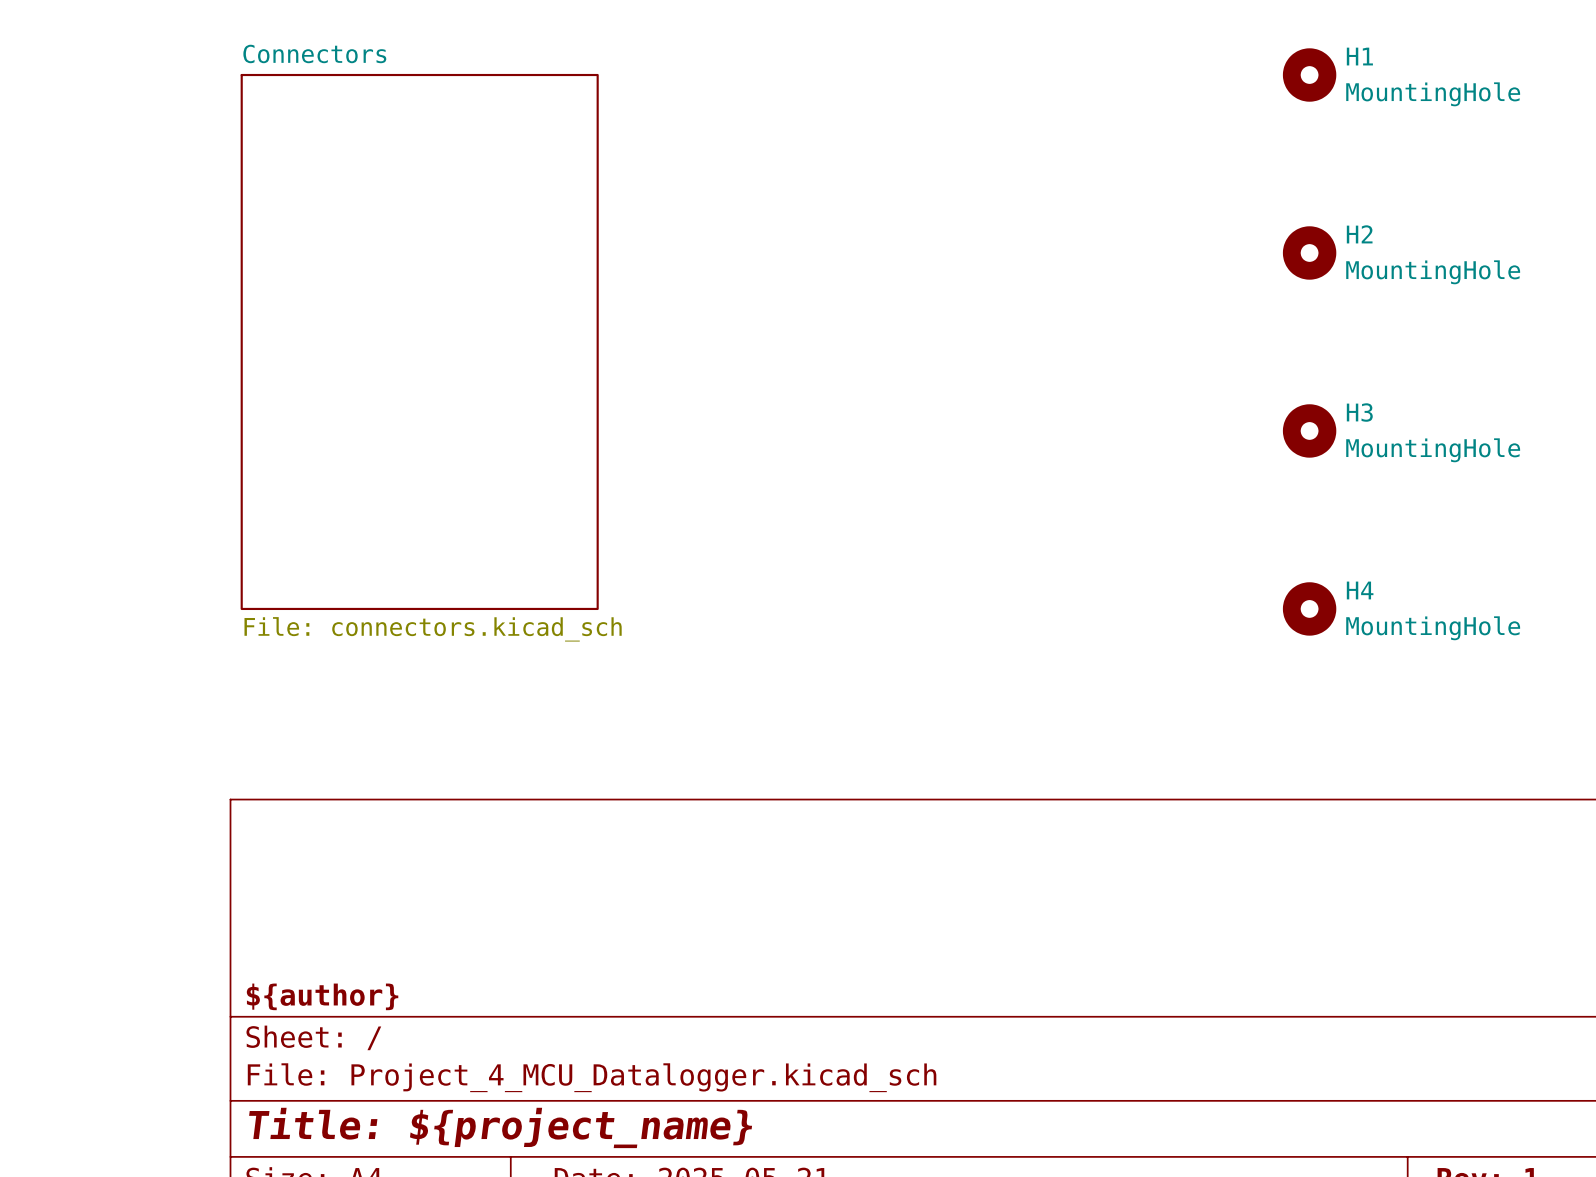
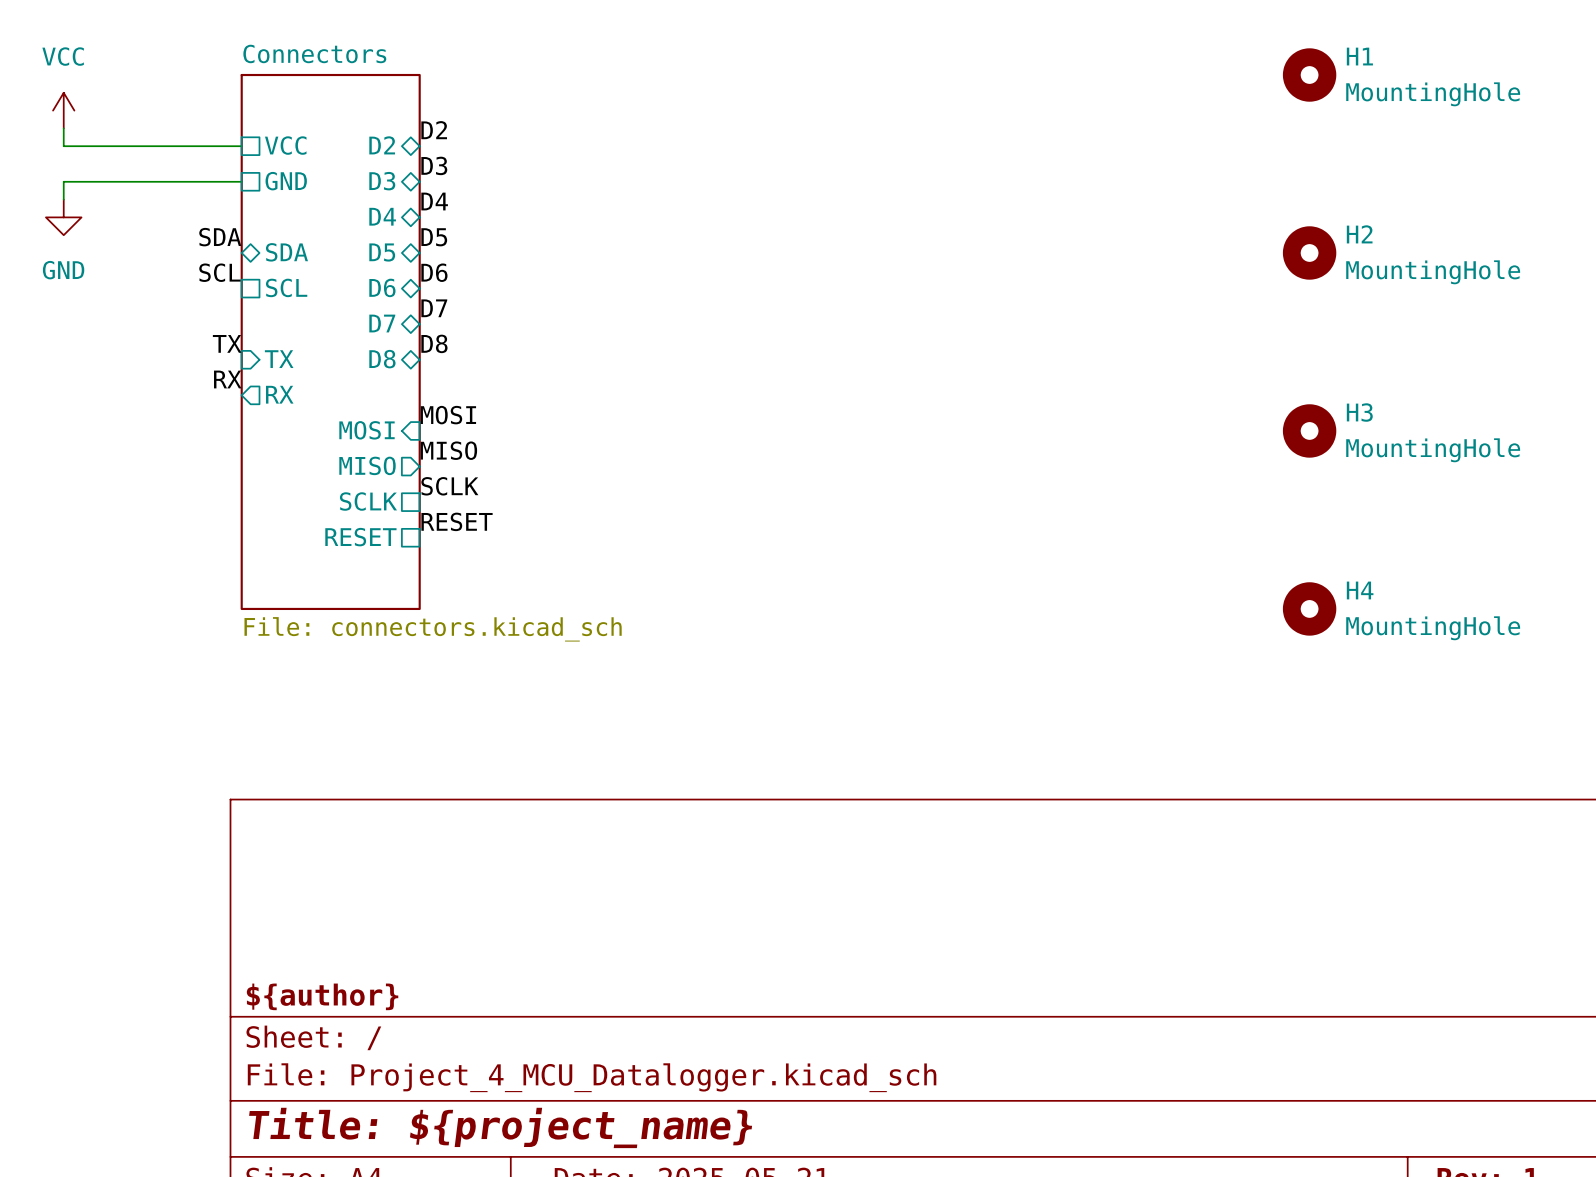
power symbol: none -> VCC (63, 110)
wire: none -> (63, 128) (63, 146) (241, 146)
label: none -> D2 (434, 130)
sheet pin: none -> VCC (285, 145)
sheet pin: none -> D2 (382, 145)
label: none -> D3 (434, 165)
wire: none -> (241, 181) (63, 181) (63, 199)
sheet pin: none -> GND (286, 181)
sheet pin: none -> D3 (382, 181)
label: none -> D4 (434, 201)
sheet pin: none -> D4 (382, 216)
power symbol: none -> GND (63, 217)
label: none -> SDA (220, 237)
label: none -> D5 (434, 237)
sheet pin: none -> SDA (286, 252)
sheet pin: none -> D5 (382, 252)
label: none -> SCL (219, 272)
label: none -> D6 (434, 272)
sheet pin: none -> SCL (286, 287)
sheet pin: none -> D6 (382, 287)
label: none -> D7 (434, 308)
sheet pin: none -> D7 (382, 323)
sheet Connectors: none -> File: connectors.kicad_sch (330, 341)
sheet Connectors: File: connectors.kicad_sch (419, 341) -> none
label: none -> TX (227, 343)
label: none -> D8 (434, 343)
sheet pin: none -> TX (279, 359)
sheet pin: none -> D8 (382, 359)
label: none -> RX (227, 379)
sheet pin: none -> RX (279, 394)
label: none -> MOSI (448, 415)
sheet pin: none -> MOSI (367, 430)
label: none -> MISO (448, 450)
sheet pin: none -> MISO (367, 465)
label: none -> SCLK (449, 486)
sheet pin: none -> SCLK (368, 501)
label: none -> RESET (457, 521)
sheet pin: none -> RESET (360, 537)

